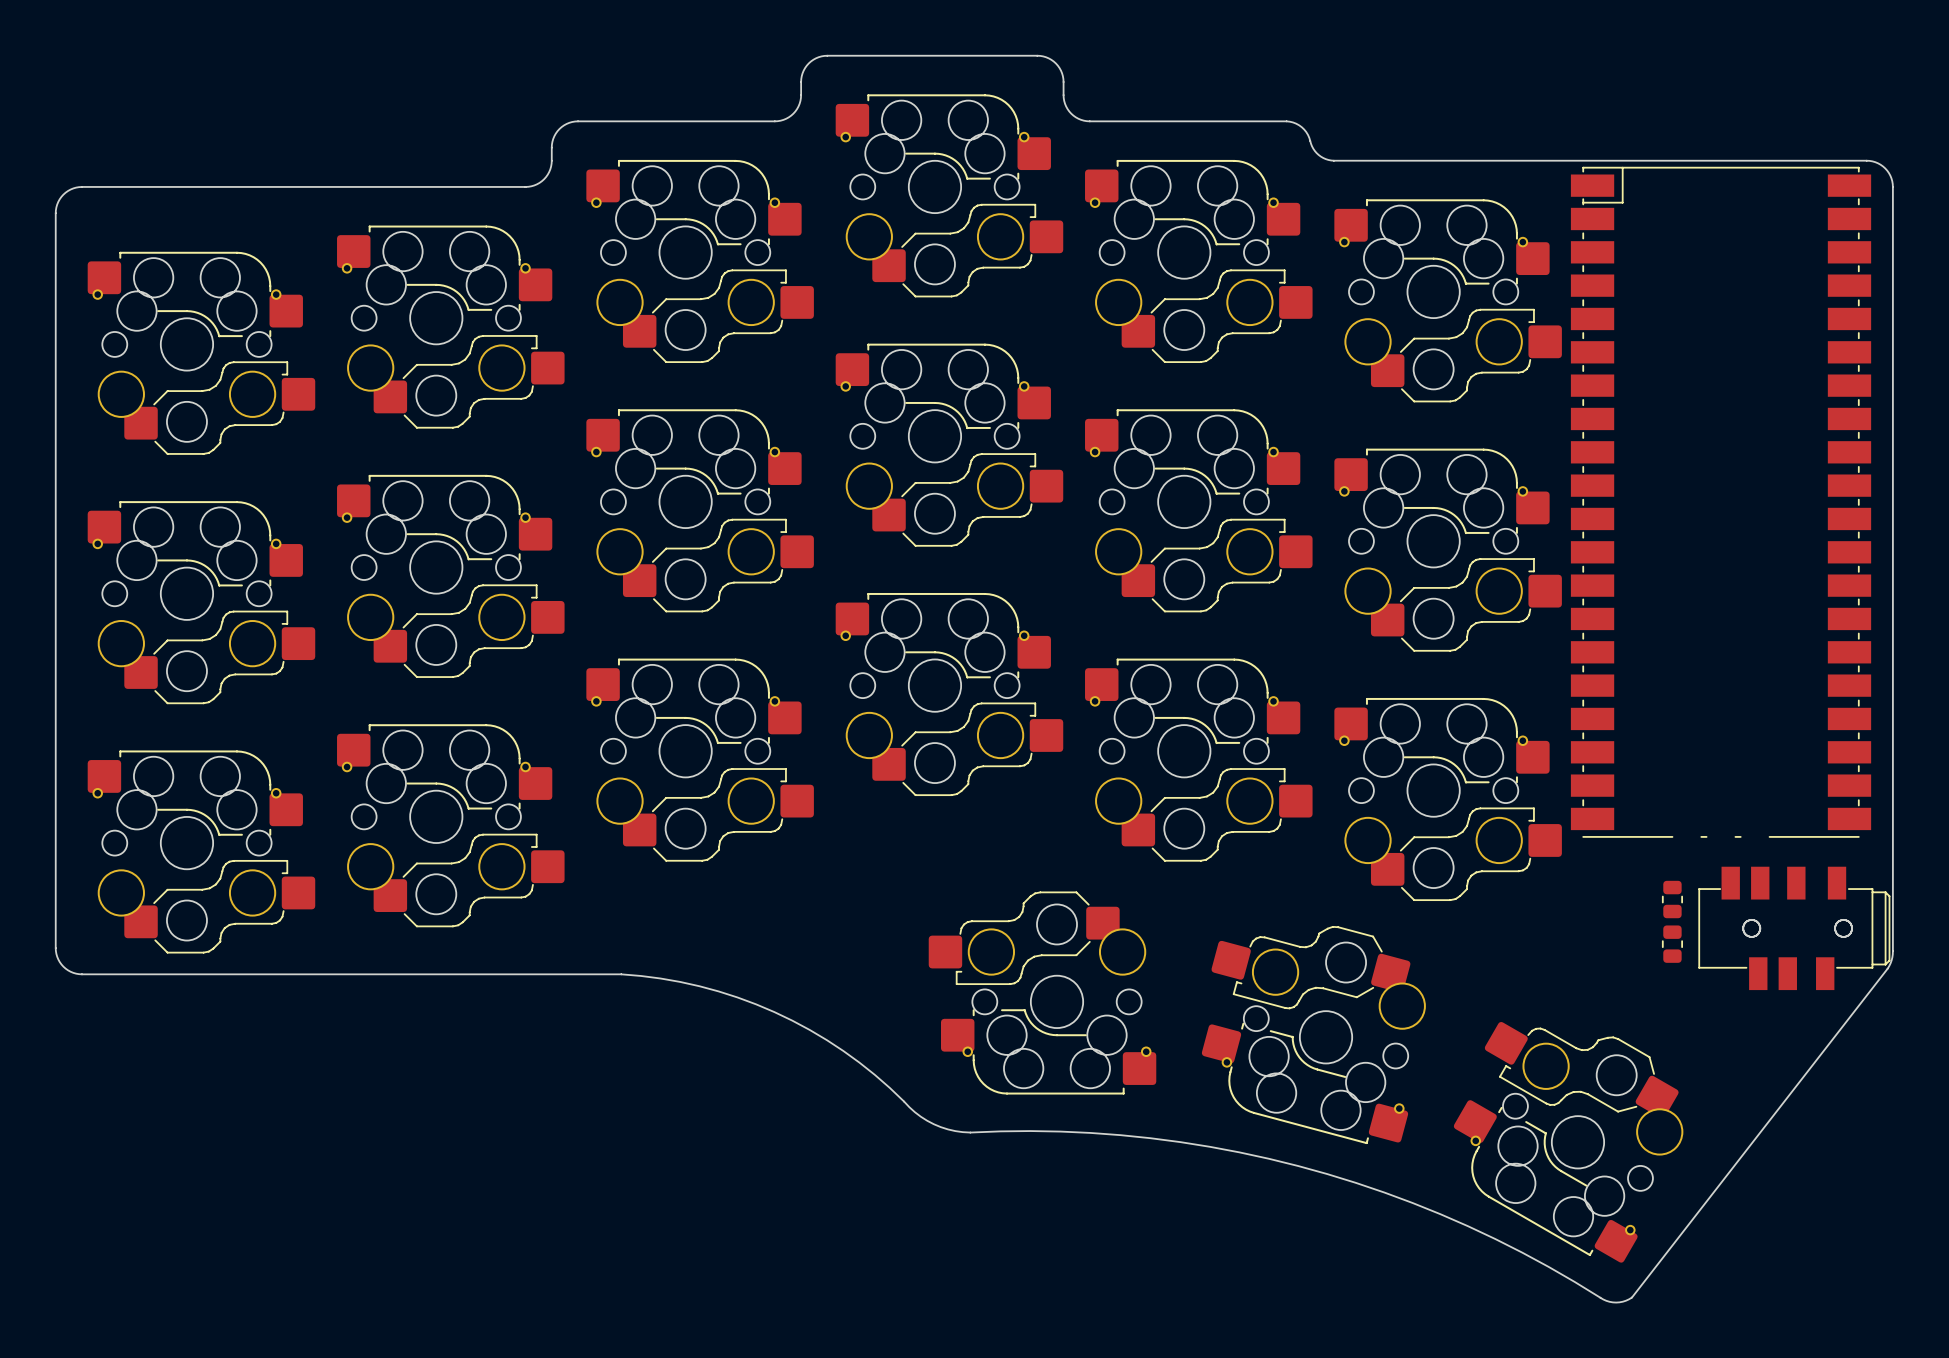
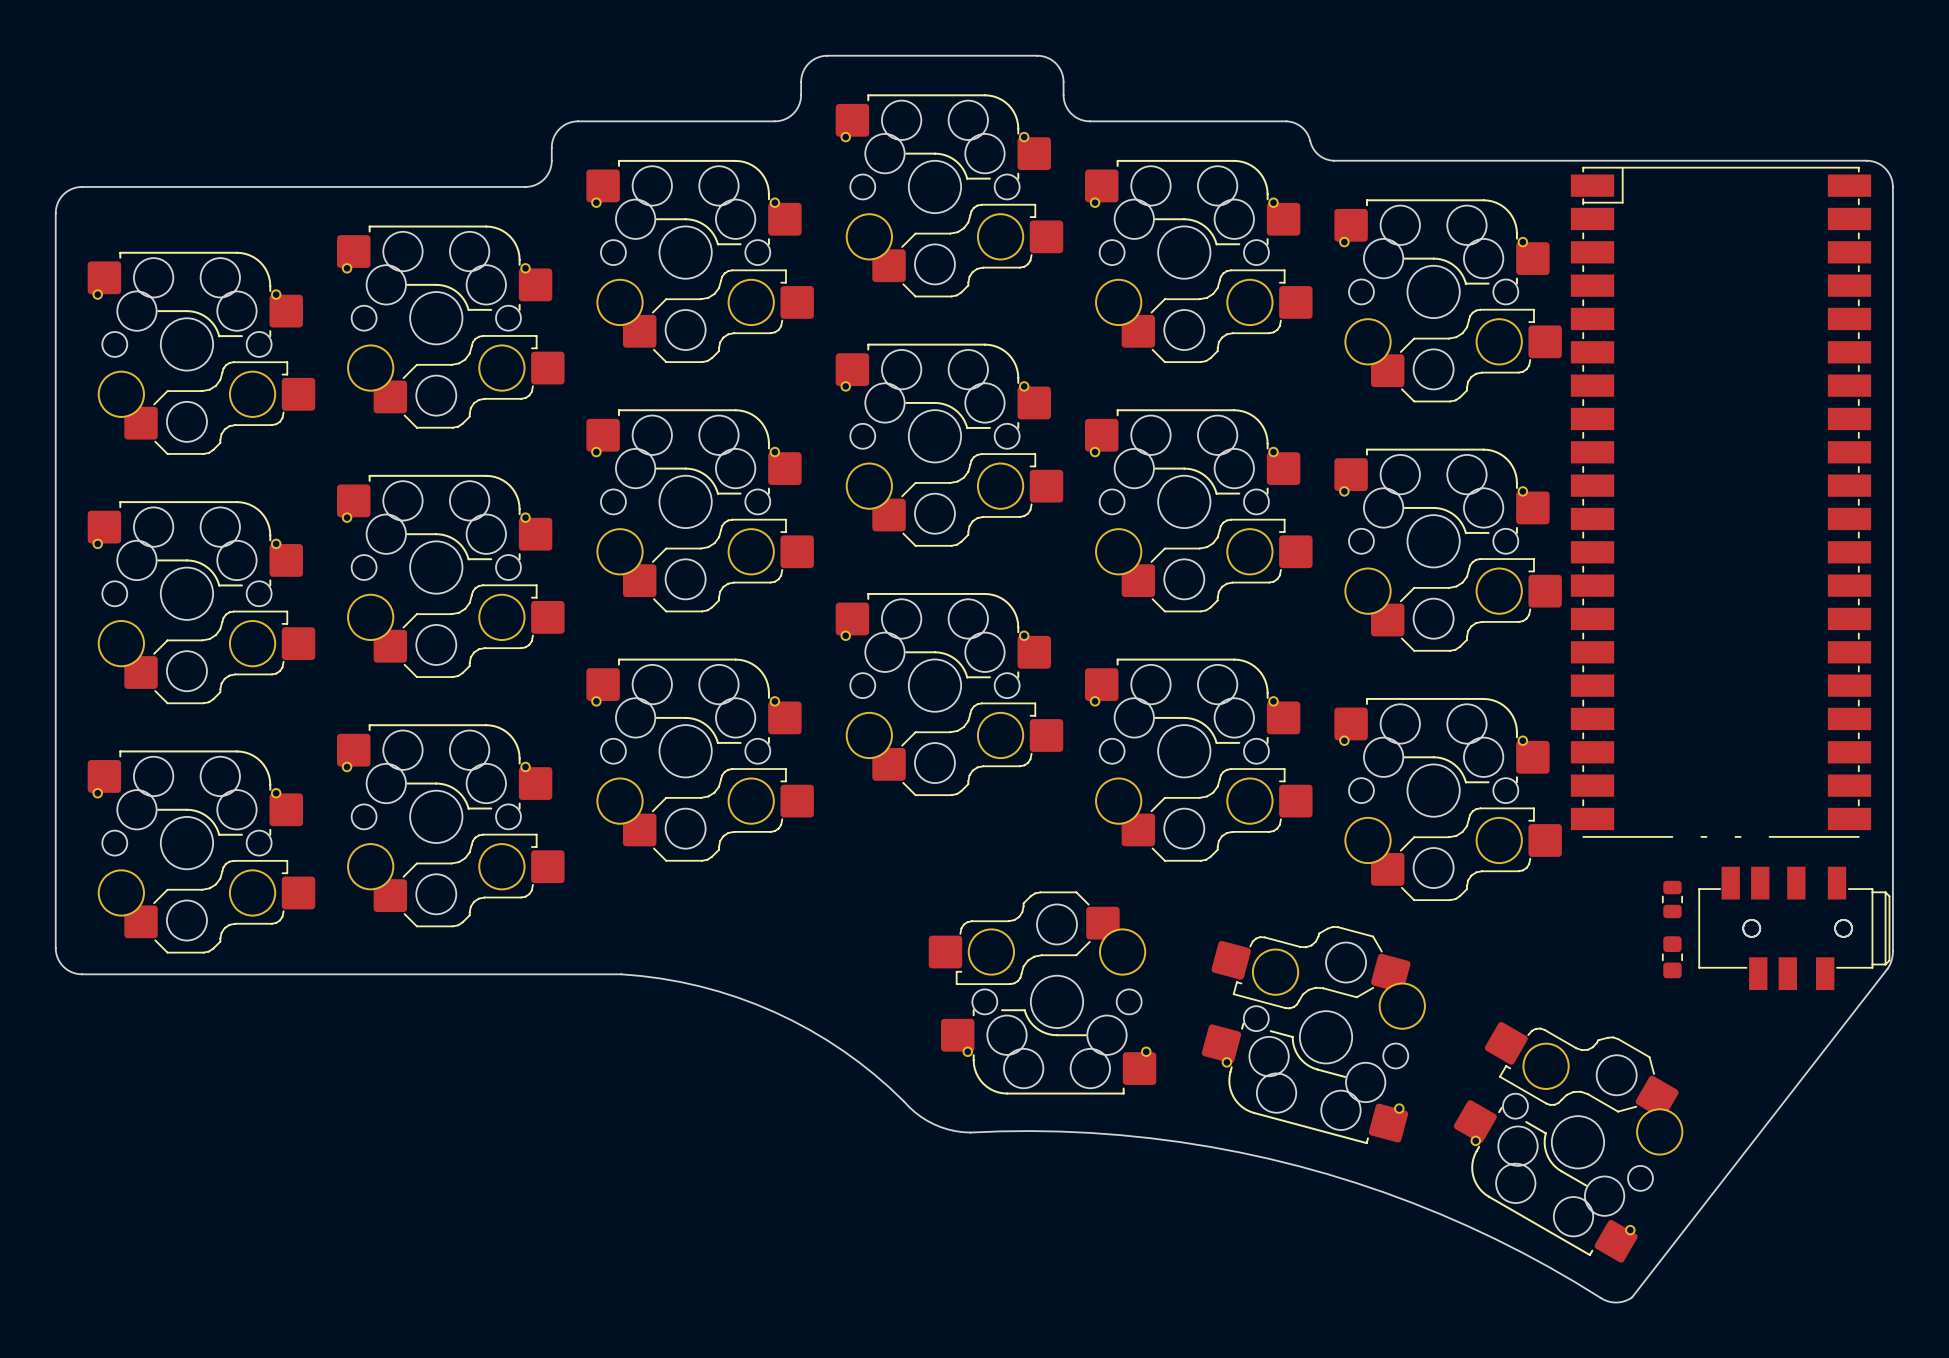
part footprint: [1662, 925, 1683, 963] -> [1662, 936, 1683, 979]

